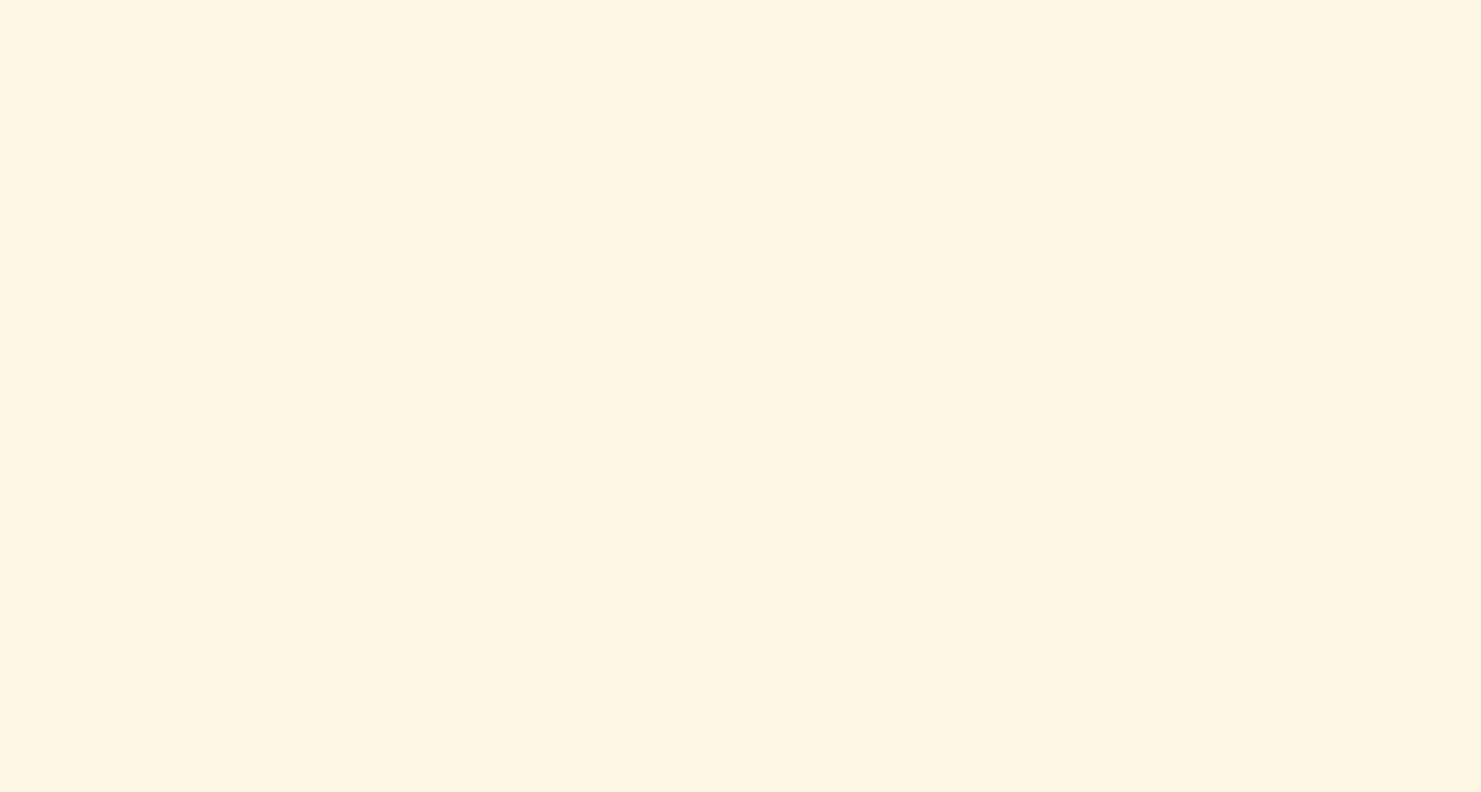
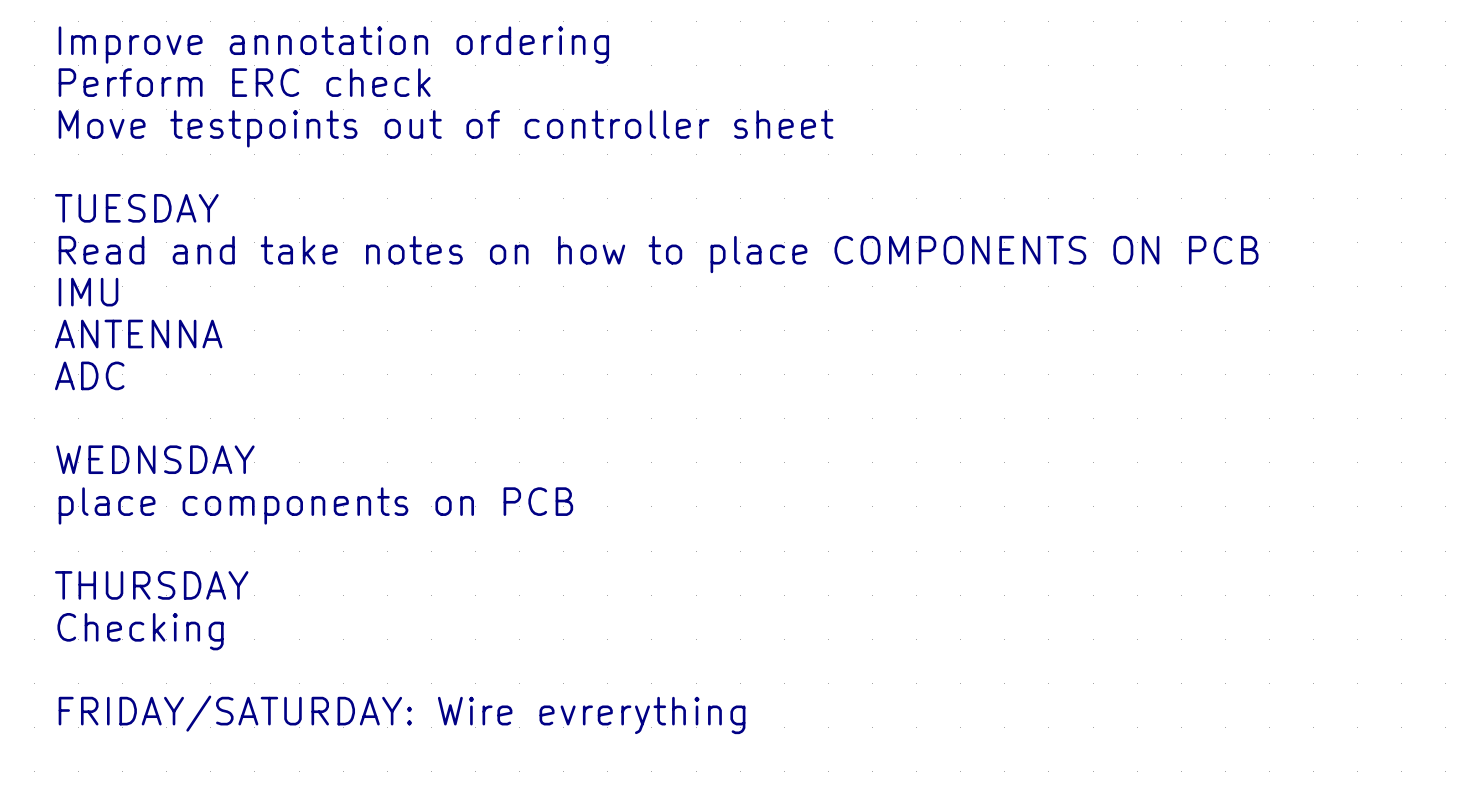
text: none -> Improve annotation ordering (333, 45)
text: none -> Perform ERC check (244, 82)
text: none -> Move testpoints out of controller sheet (446, 128)
text: none -> TUESDAY (136, 208)
text: none -> Read and take notes on how to place COMPONENTS ON PCB (658, 254)
text: none -> IMU (88, 292)
text: none -> ANTENNA (138, 334)
text: none -> ADC (89, 375)
text: none -> WEDNSDAY (155, 459)
text: none -> place components on PCB (315, 505)
text: none -> THURSDAY (151, 585)
text: none -> Checking (140, 631)
text: none -> FRIDAY/SATURDAY: Wire evrerything (402, 714)

